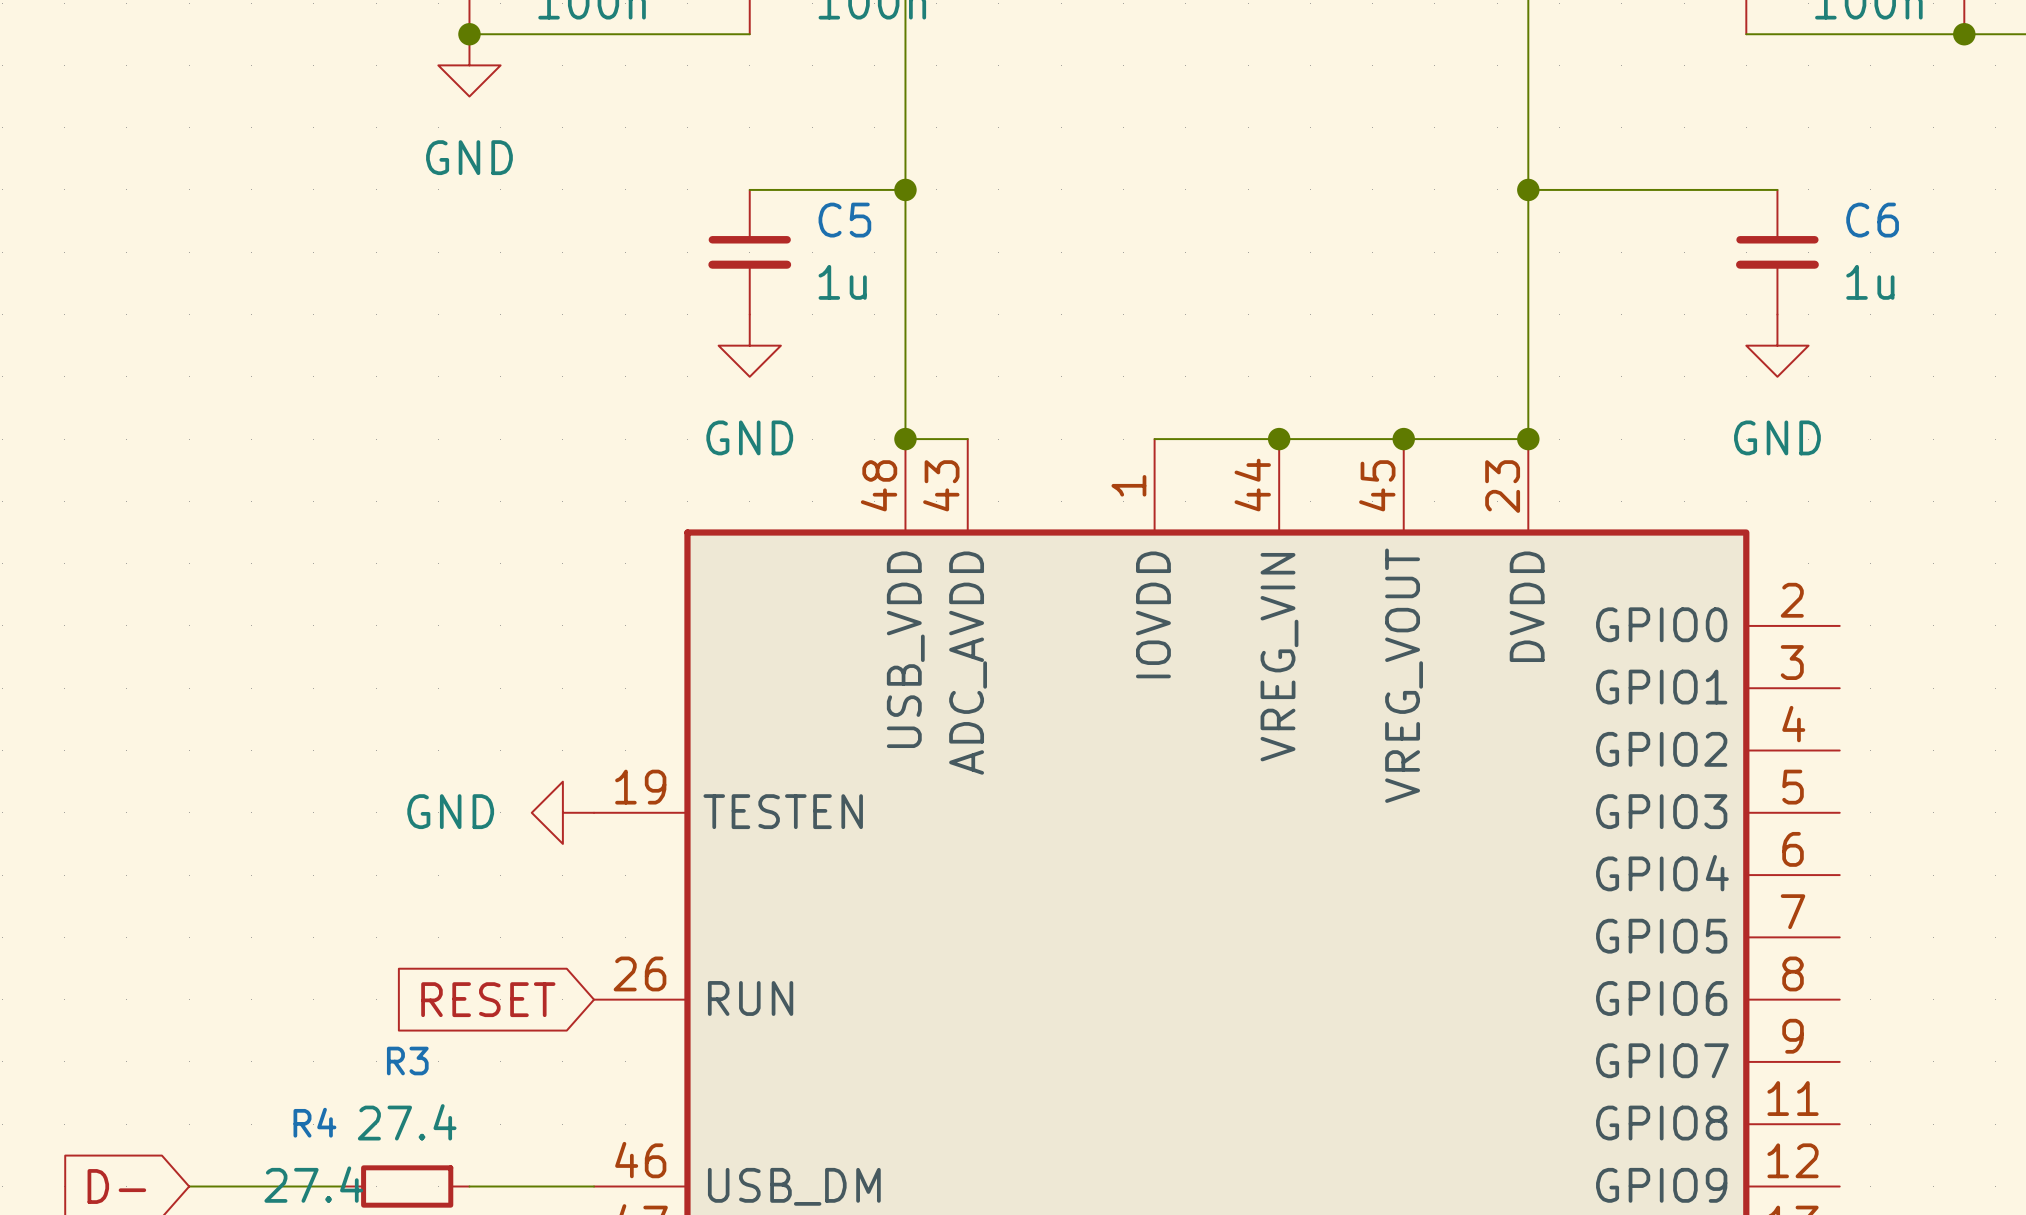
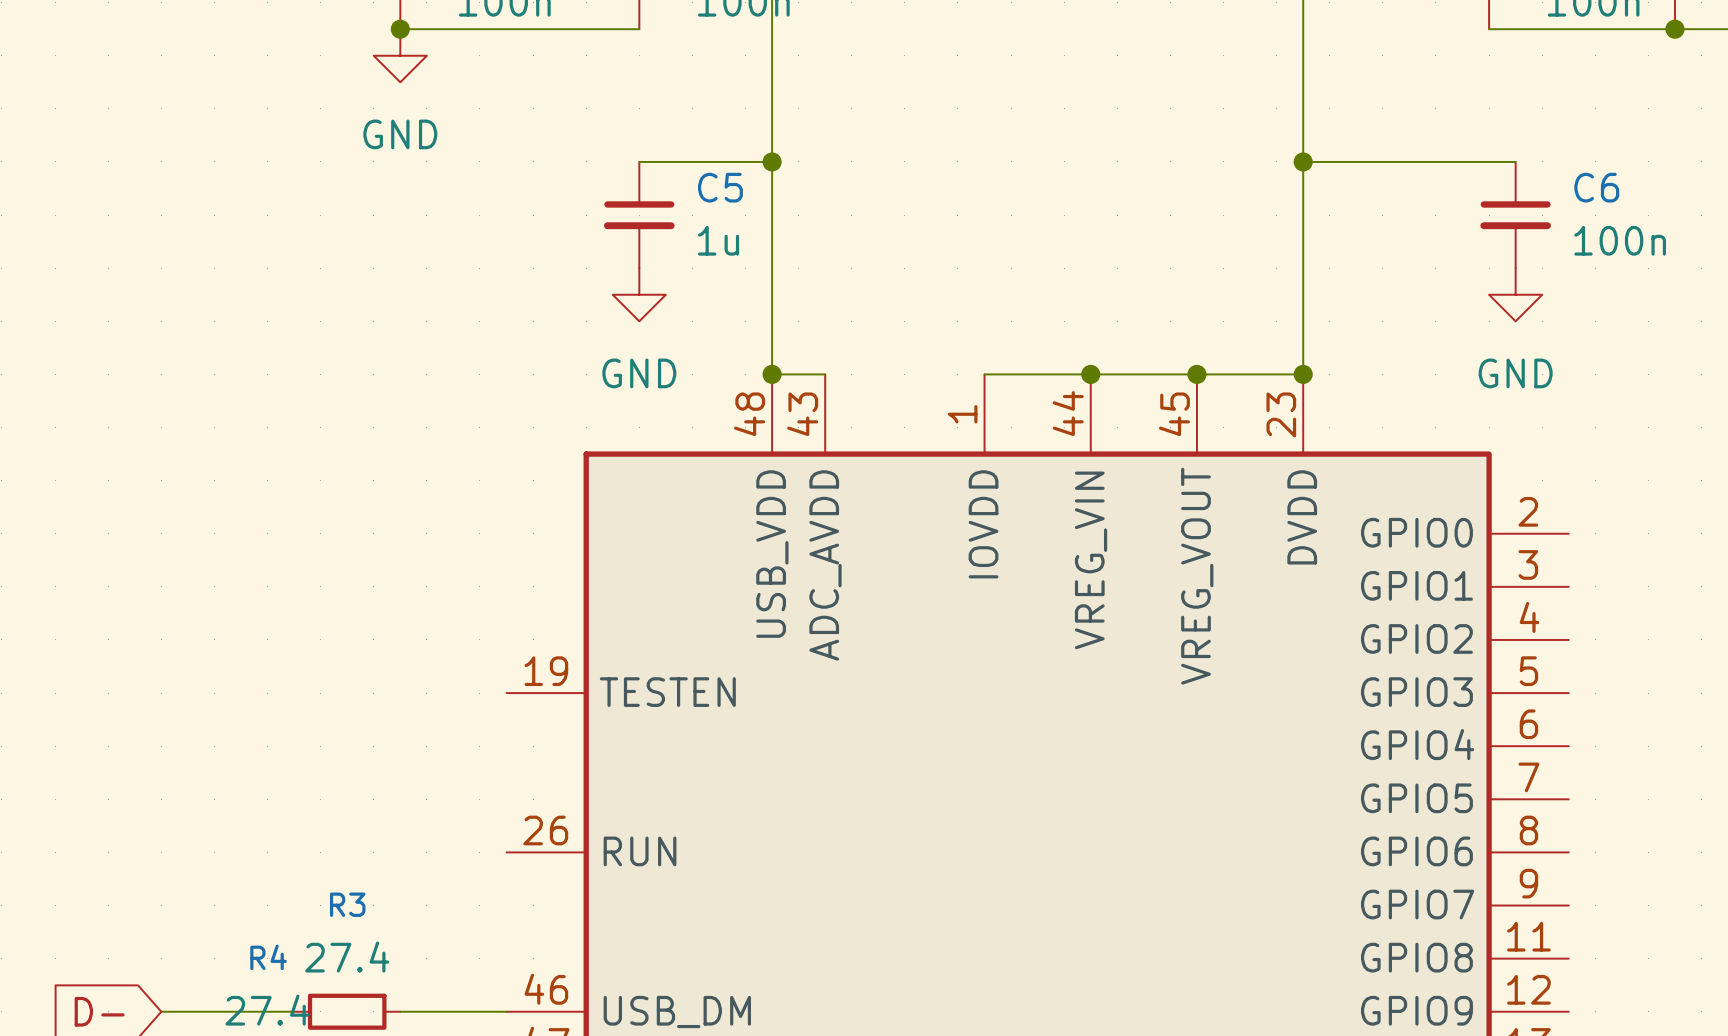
C6 value: 1u (1870, 282) -> 100n (1620, 240)
power symbol: GND (562, 812) -> none
global label: RESET (488, 999) -> none

